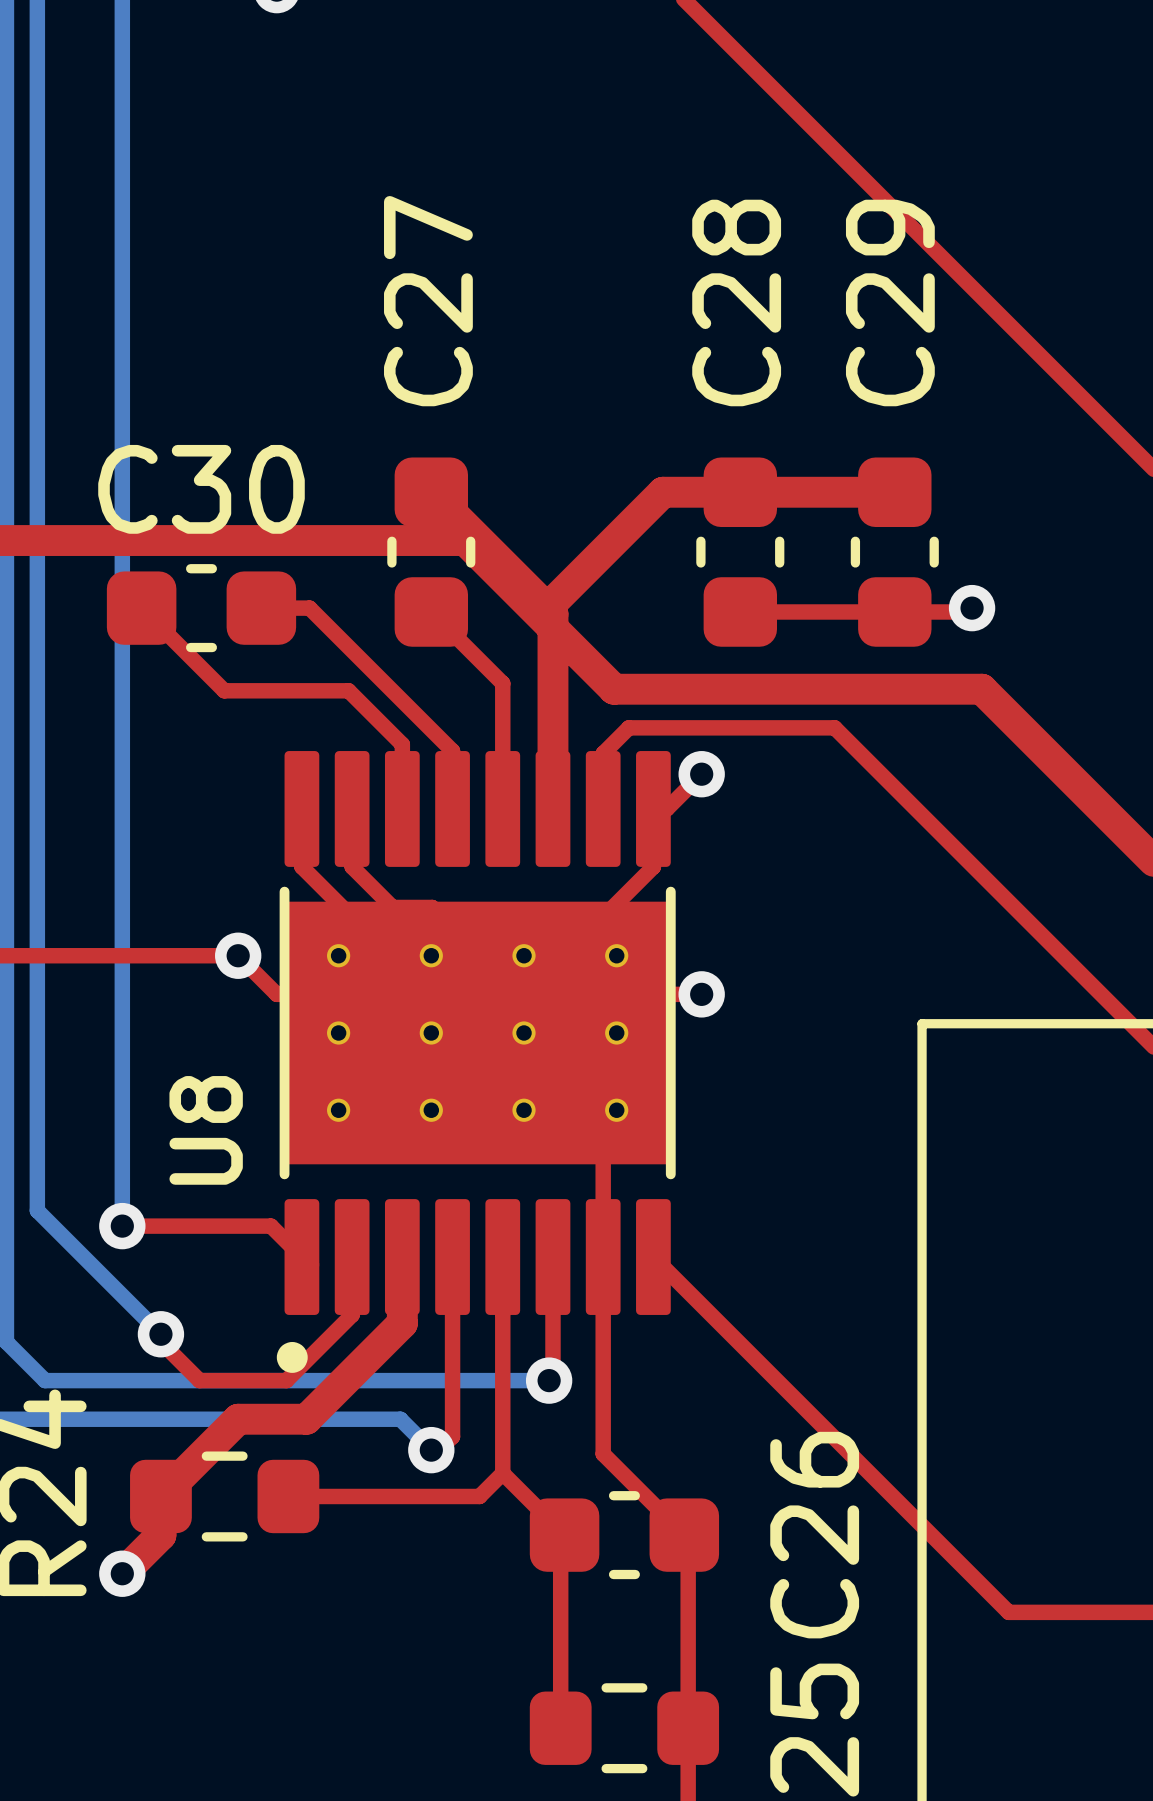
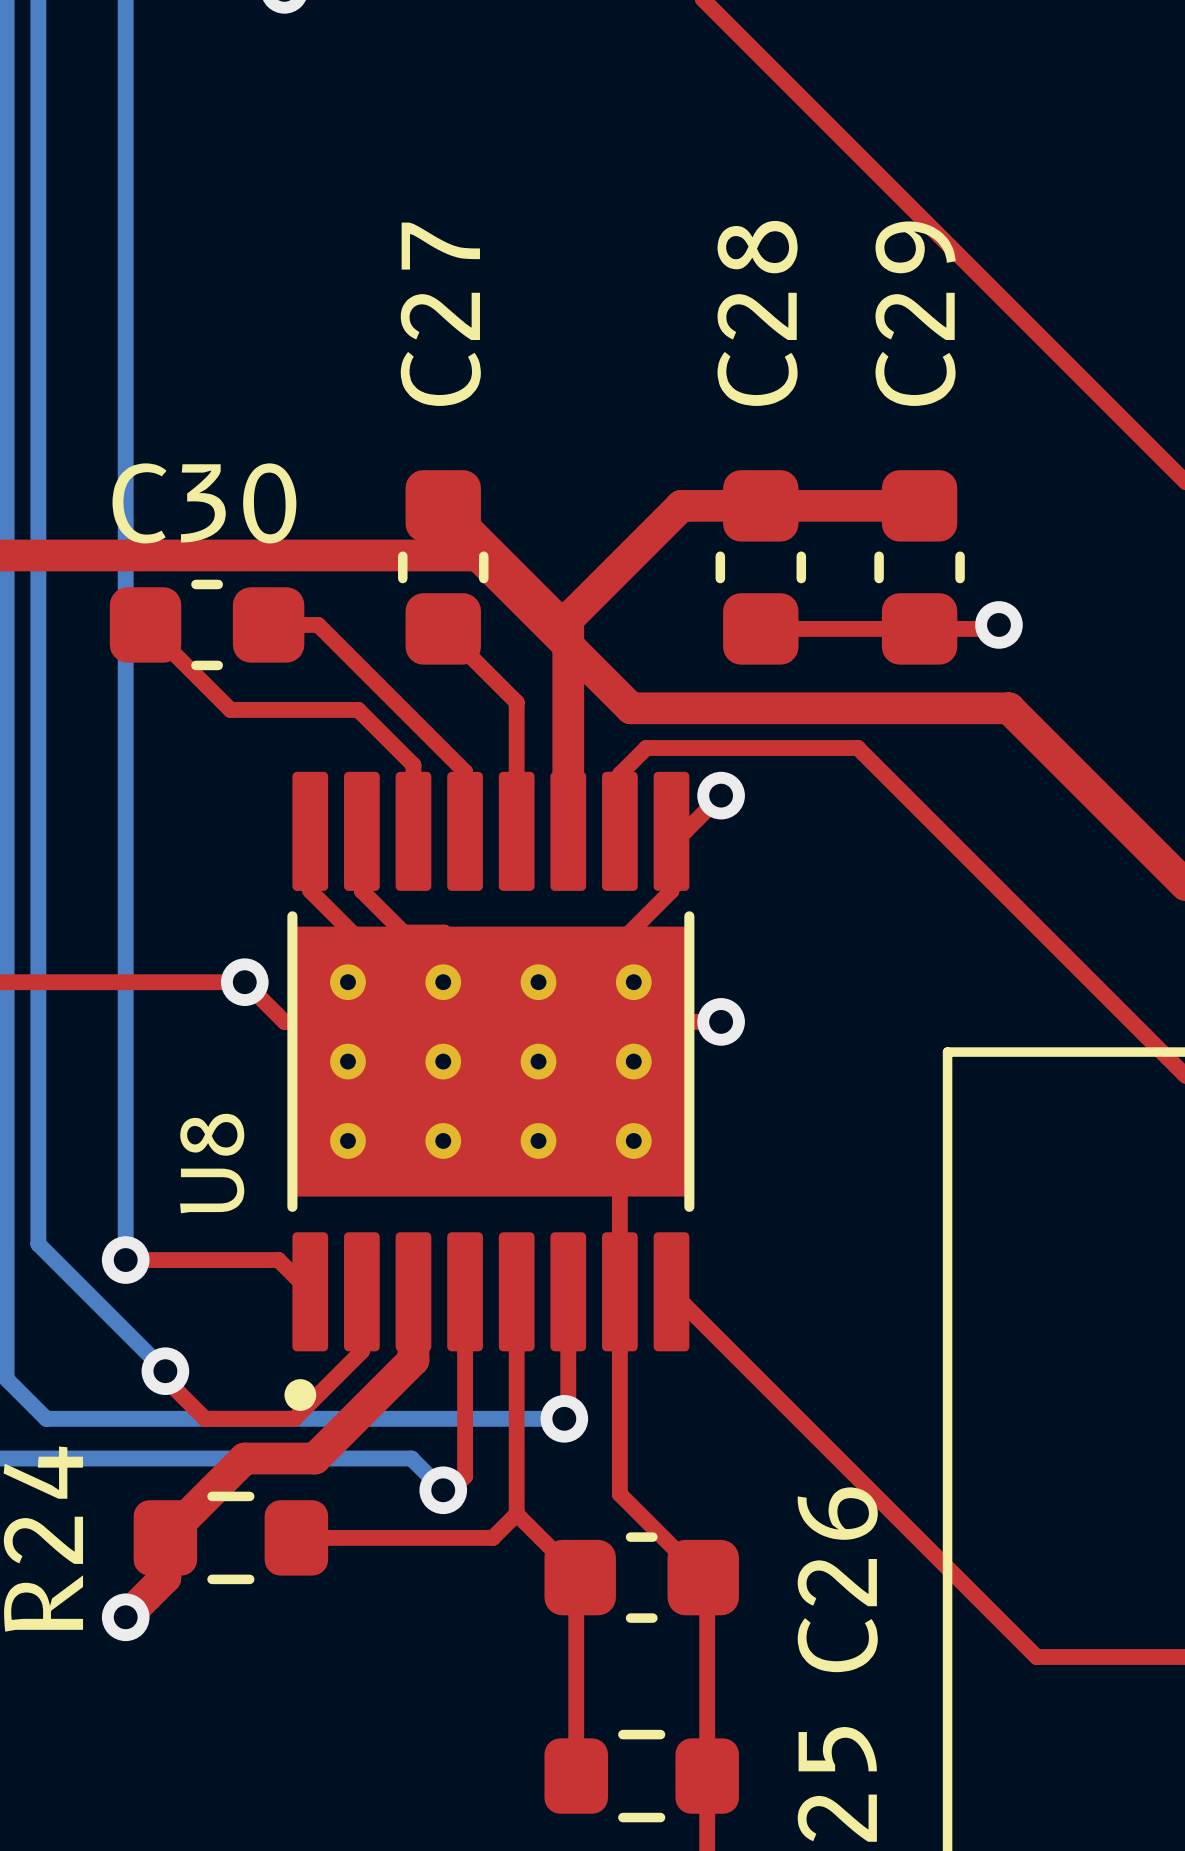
U8 footprint: [276, 751, 676, 1373] -> [284, 771, 695, 1411]

